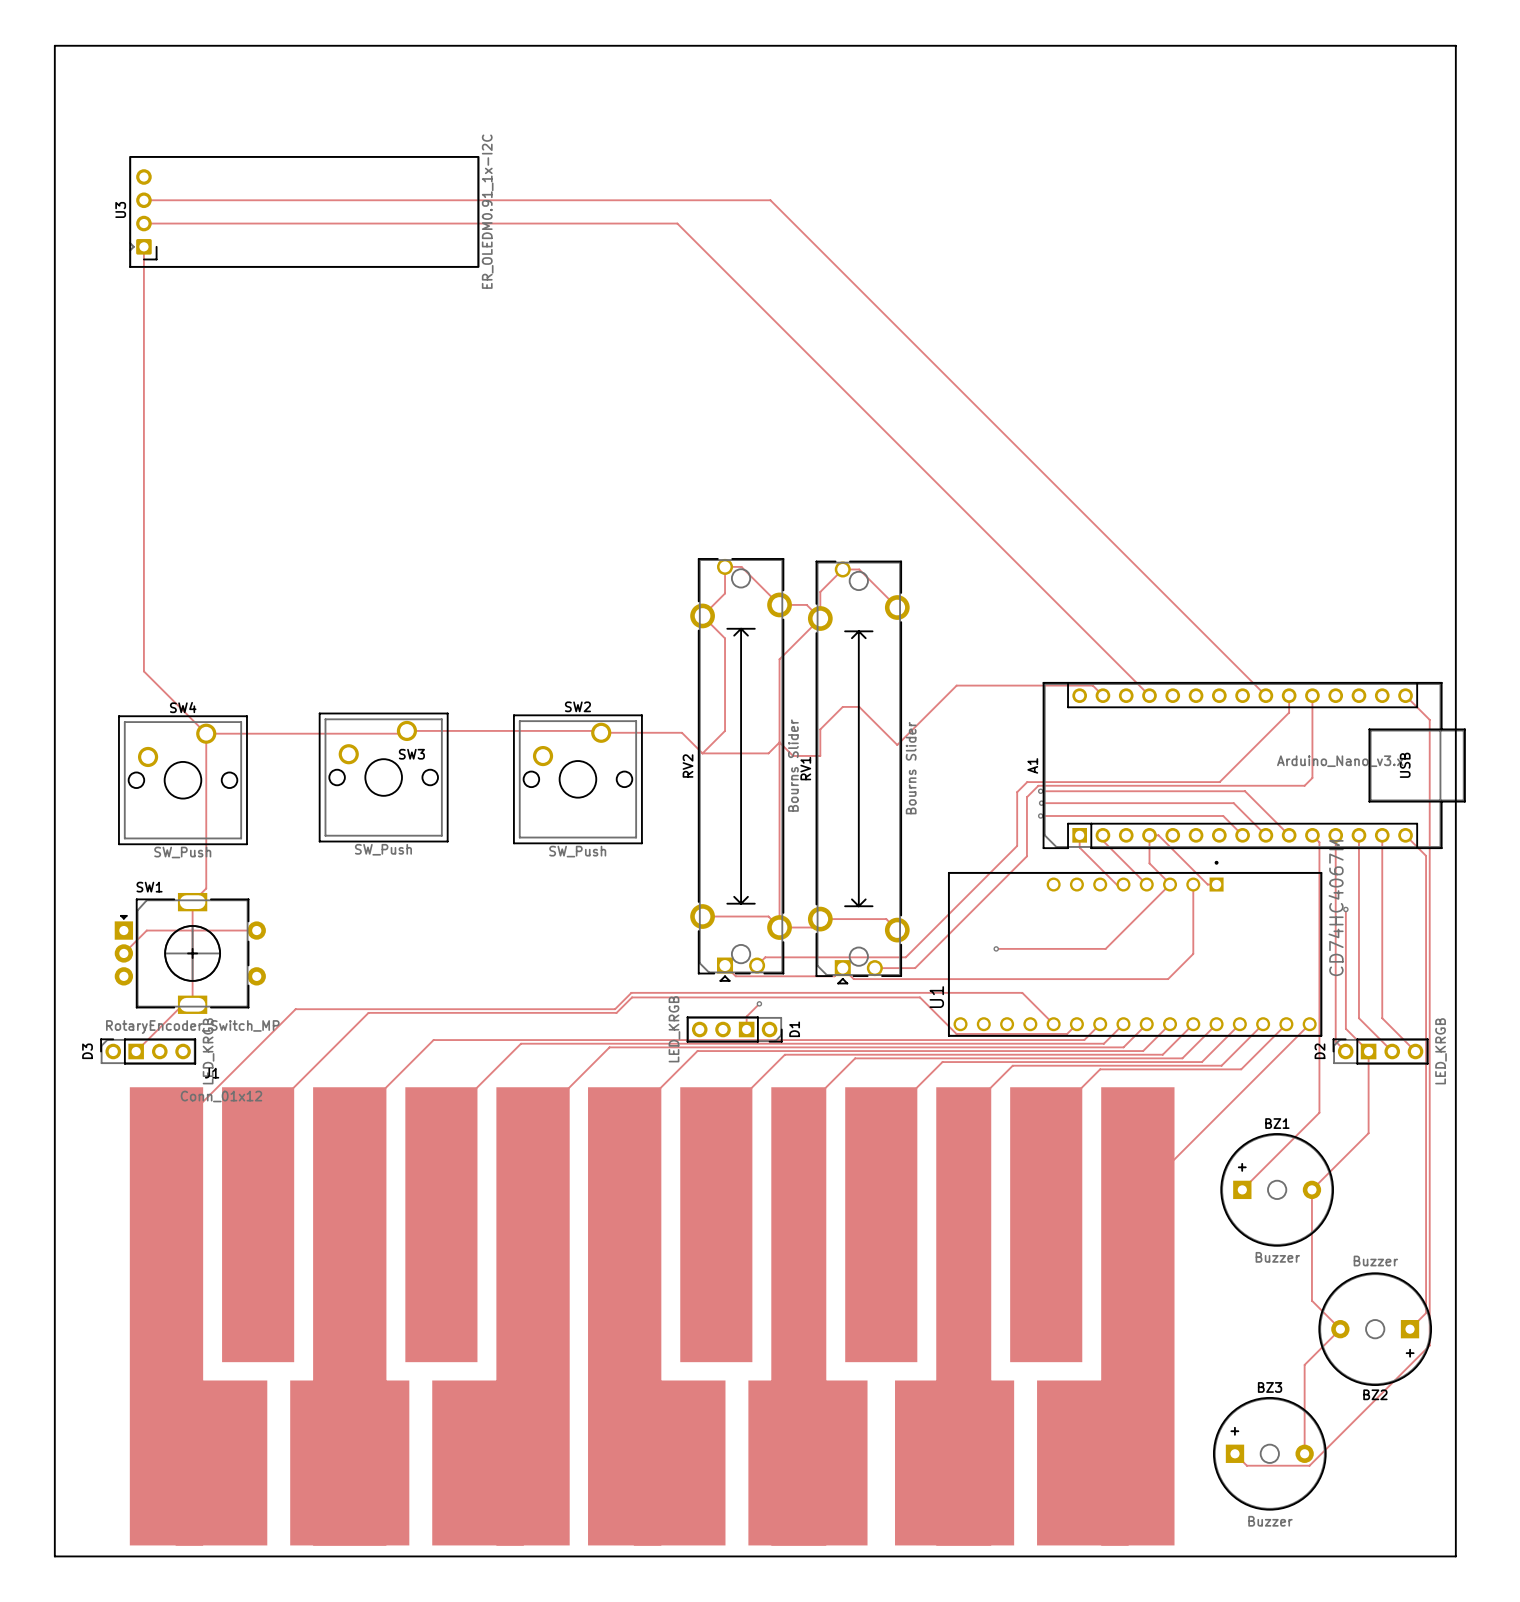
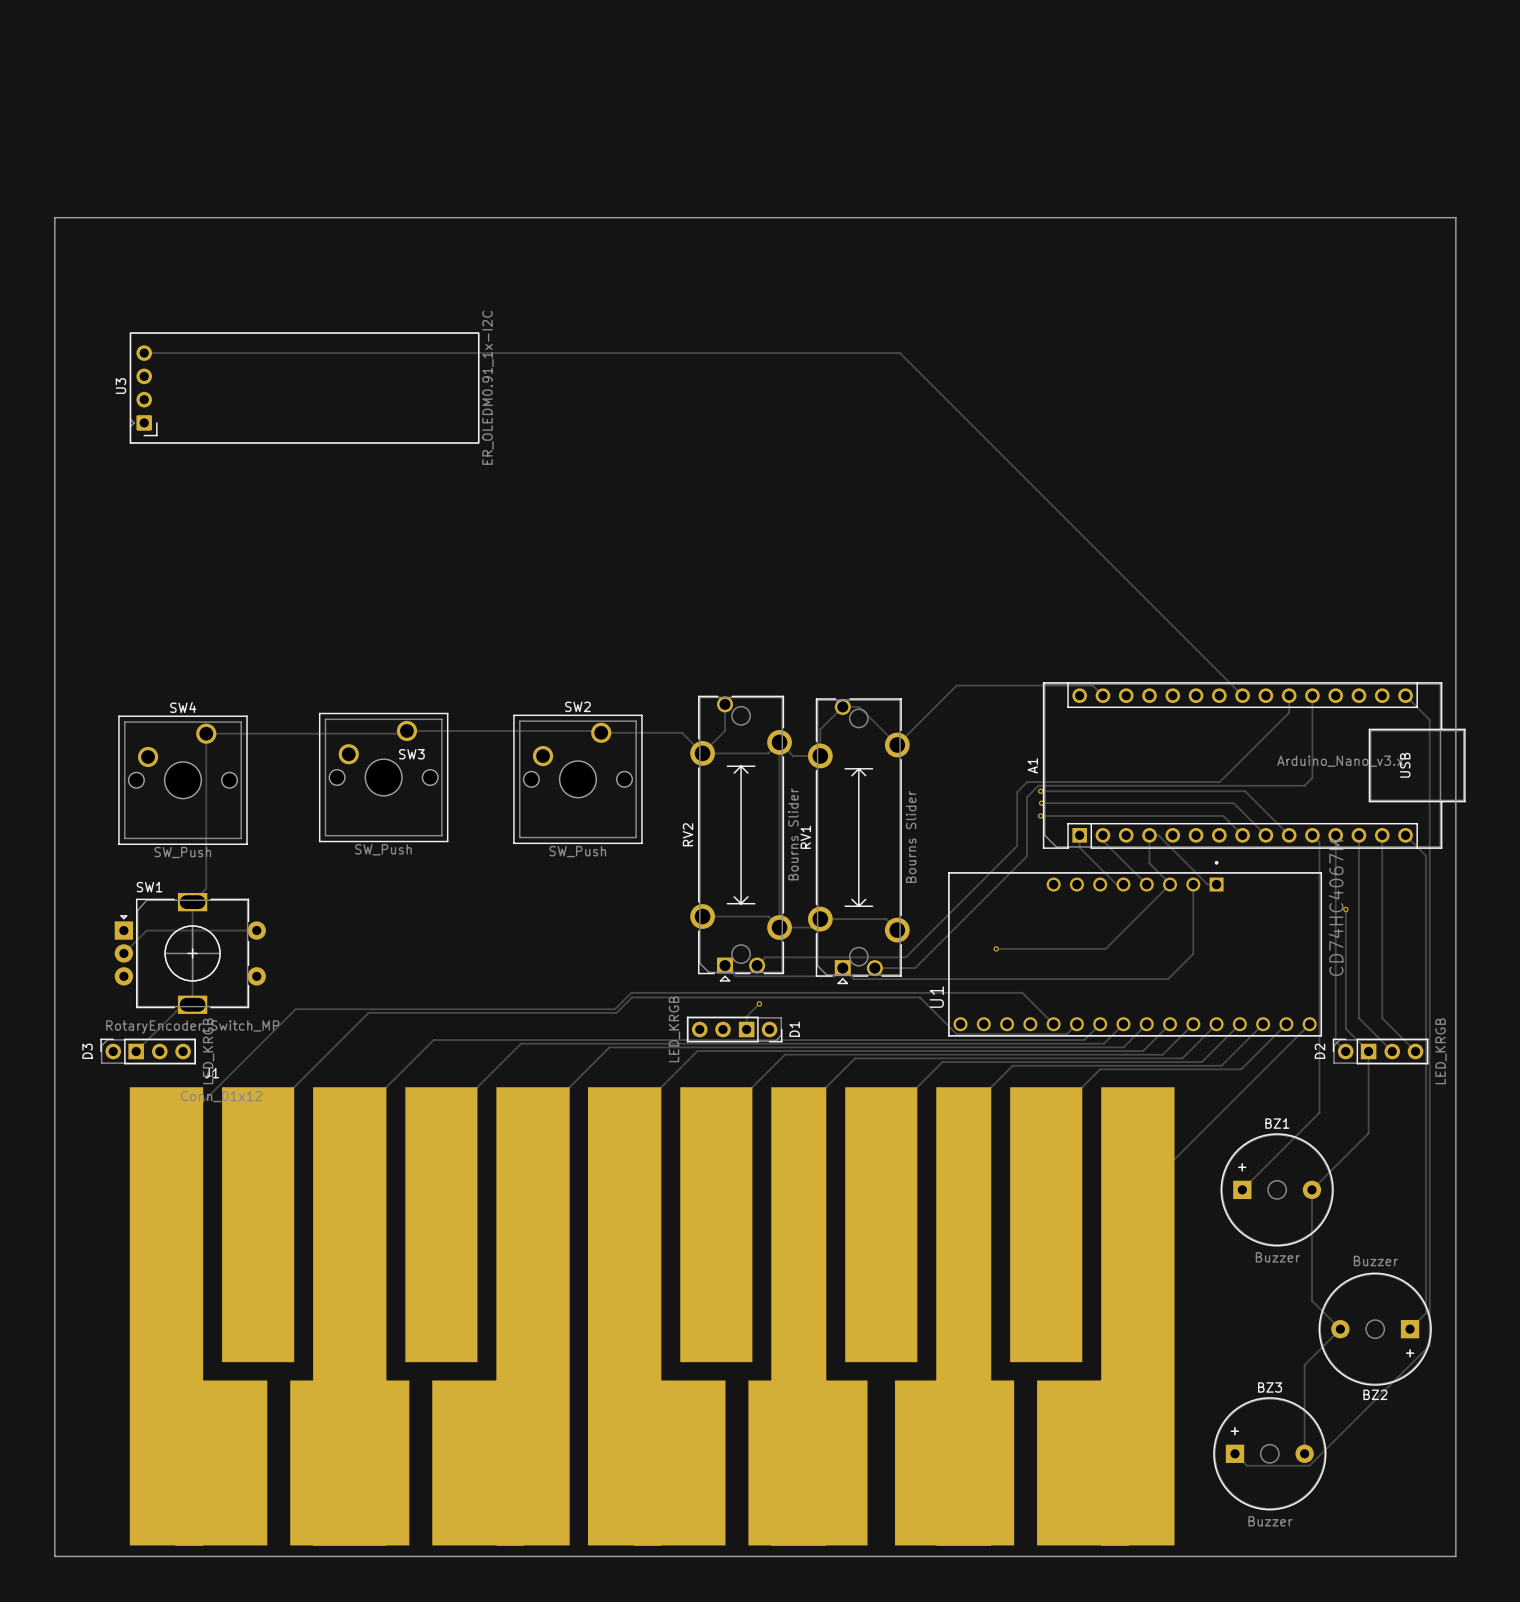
track: (143, 200) (770, 200) (1265, 695) -> none
U3 position: (304, 211) -> (304, 388)
board edge: (54, 217) (54, 45) (1455, 45) (1455, 1556) -> (54, 217) (1455, 217) (1455, 1556)
track: (143, 223) (677, 223) (1149, 695) -> none
track: (143, 246) (143, 671) (206, 733) -> none
track: none -> (144, 353) (900, 353) (1242, 695)
RV2 footprint: [690, 558, 792, 982] -> [690, 695, 792, 982]
RV1 footprint: [807, 560, 910, 985] -> [807, 698, 910, 985]
track: (897, 607) (859, 569) (842, 569) (820, 591) (820, 618) -> none
track: (820, 618) (806, 604) (779, 604) (741, 566) (725, 566) (725, 593) (702, 615) (725, 638) (725, 730) -> (725, 704) (725, 730)
track: (820, 618) (779, 659) (779, 742) -> none

